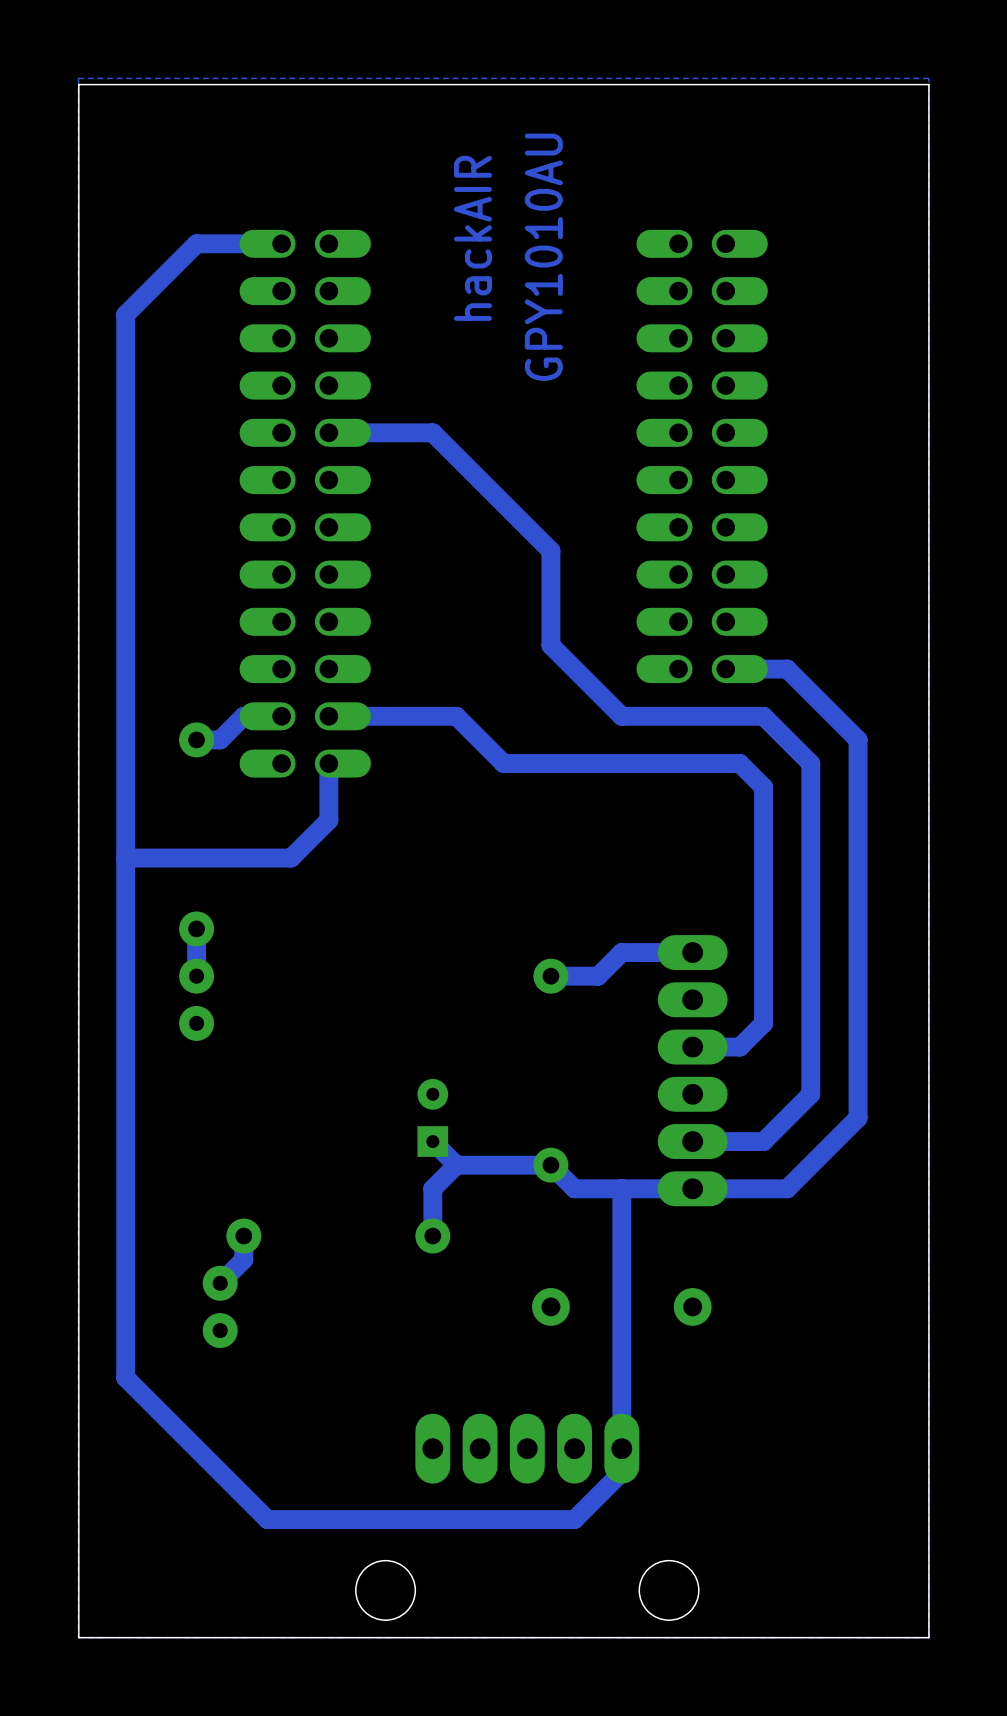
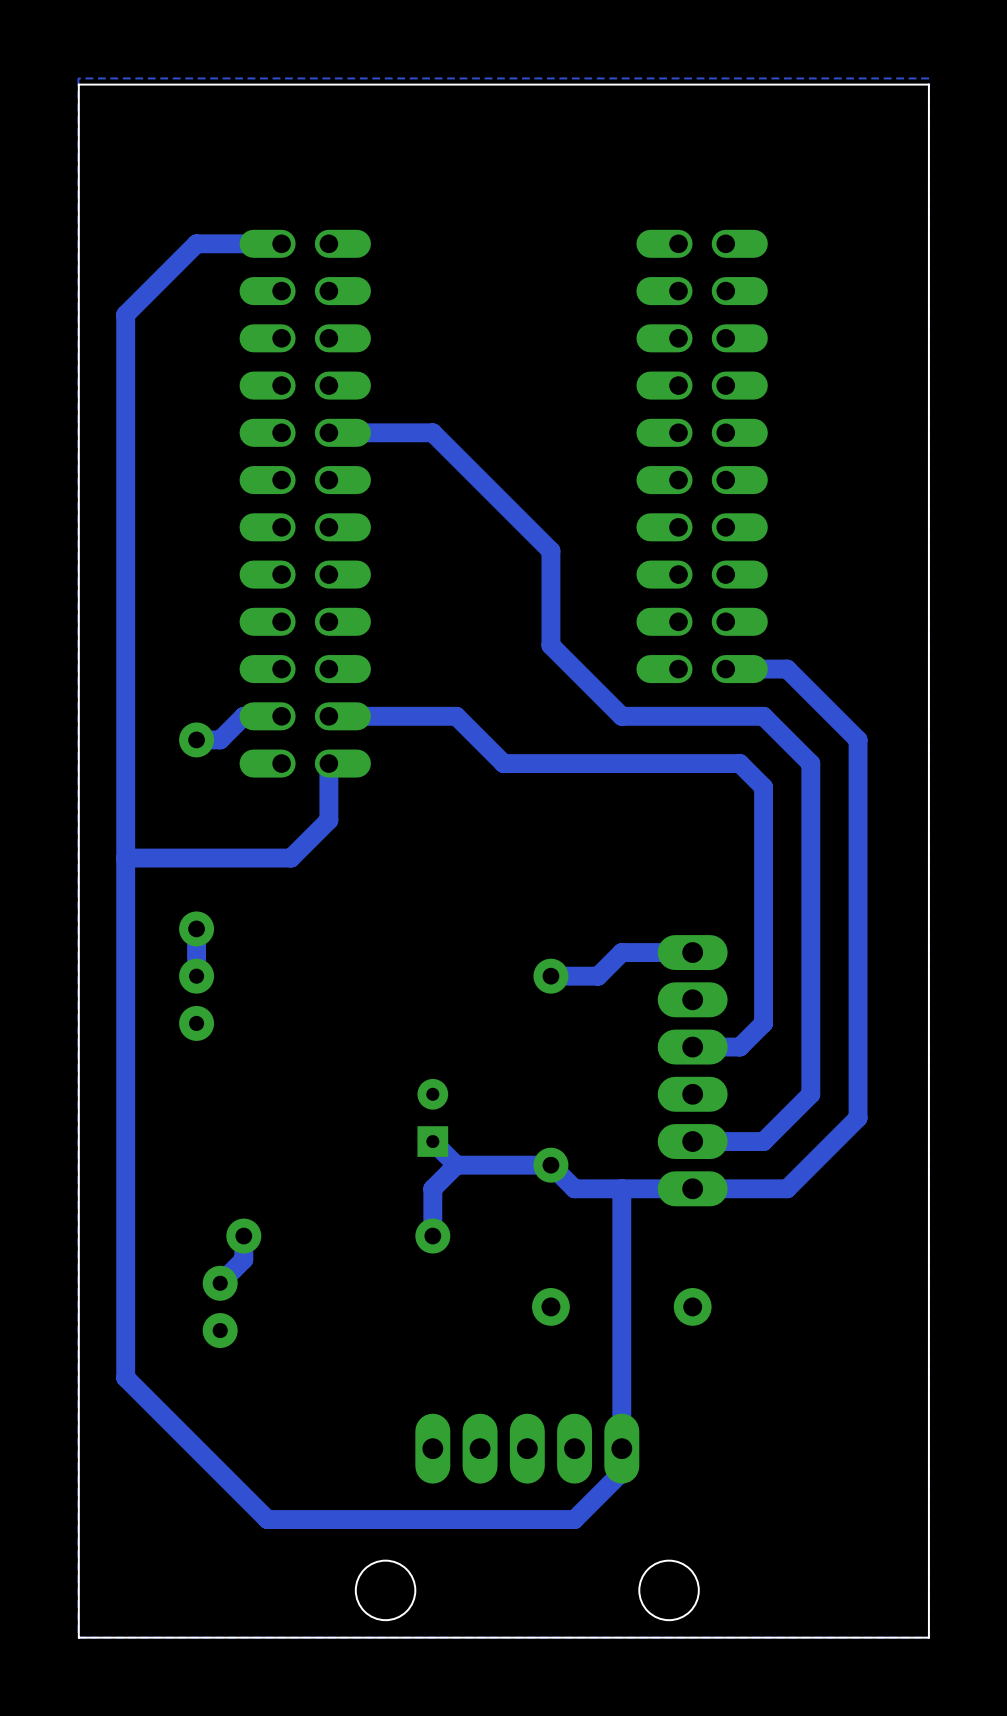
text: hackAIR (472, 238) -> none
text: GPY1010AU (543, 257) -> none

